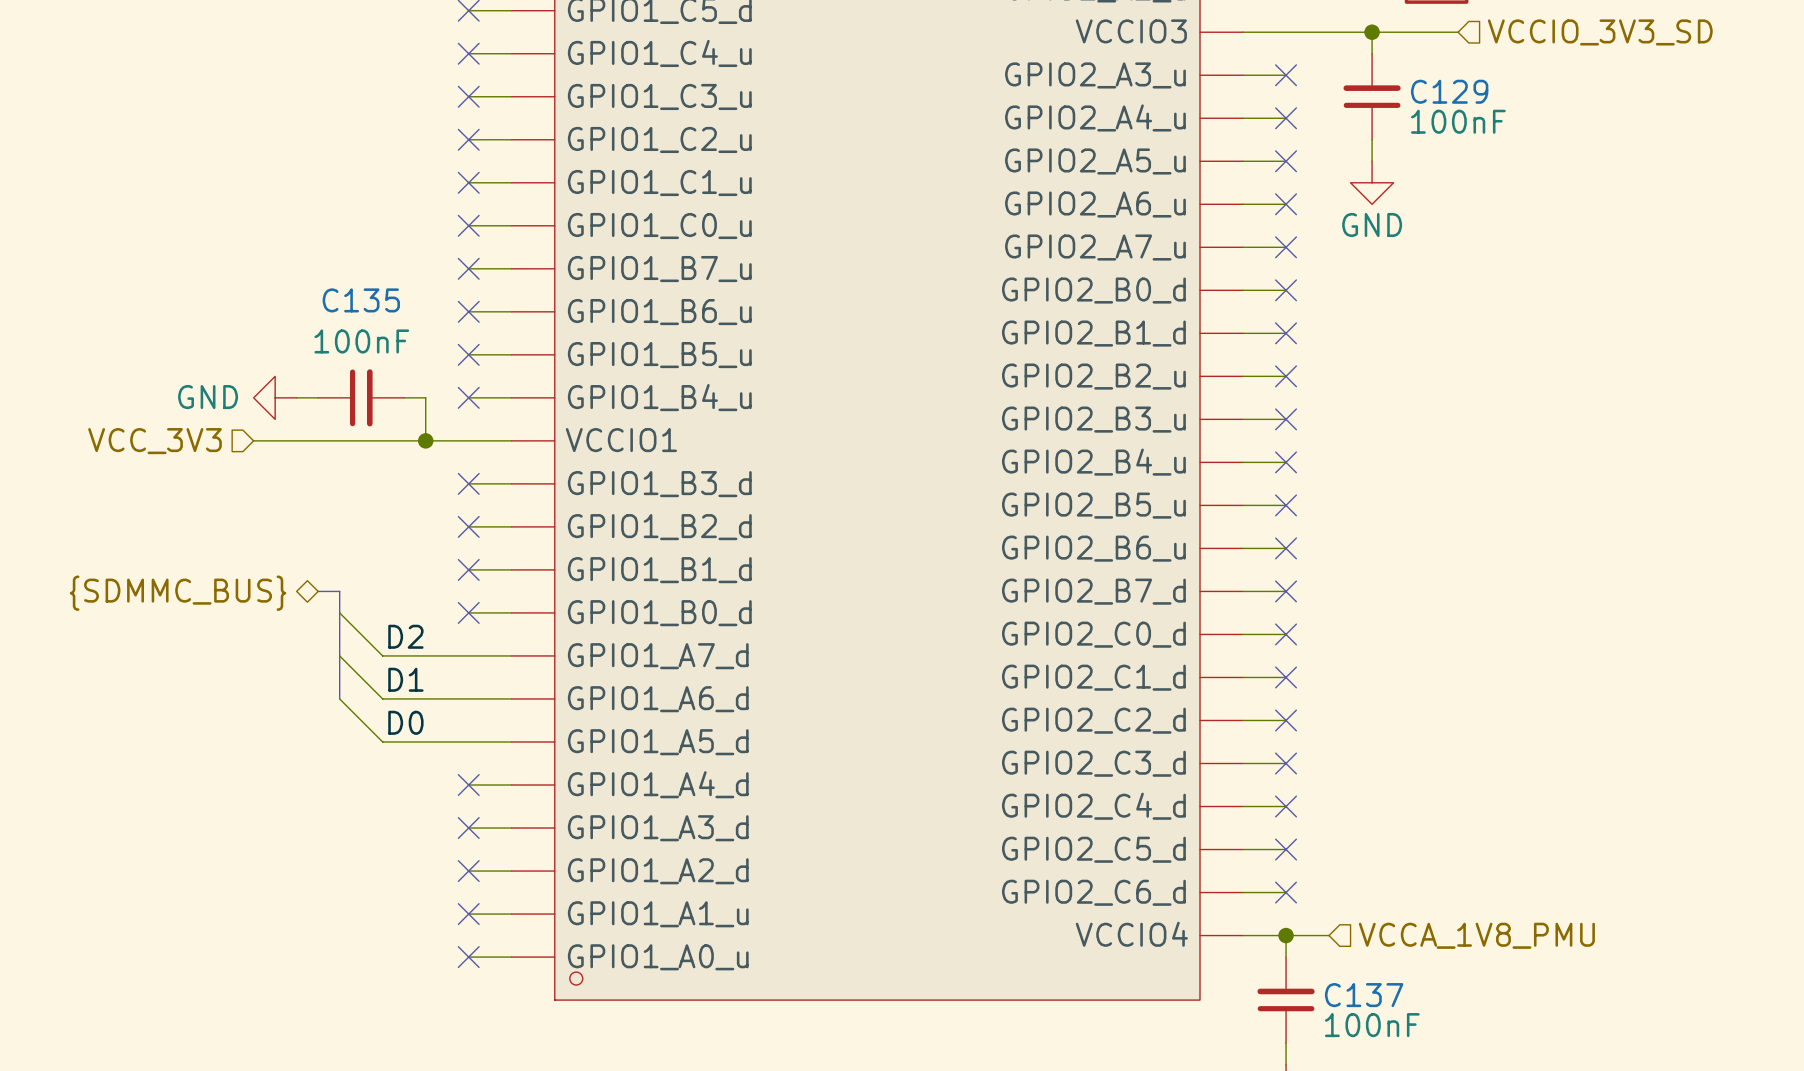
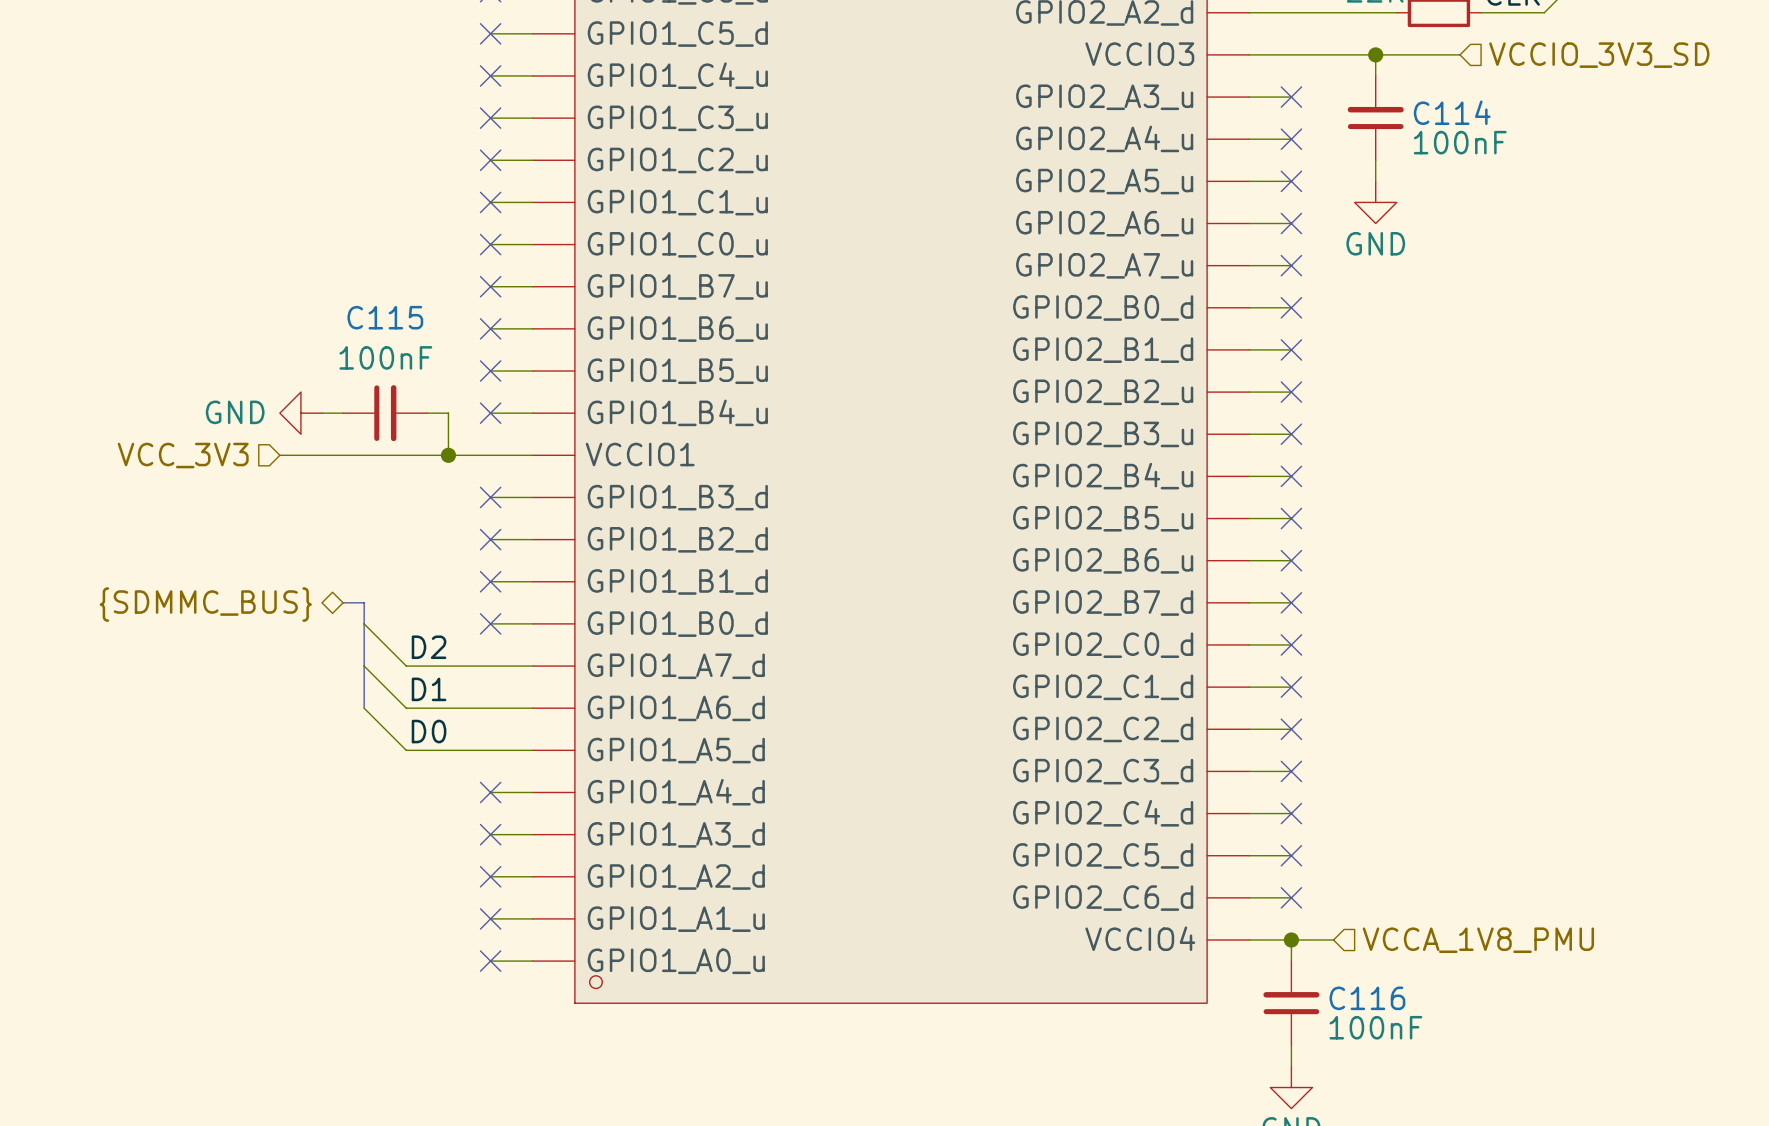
C129 name: C129 (1449, 91) -> C114 (1452, 112)
C135 name: C135 (361, 300) -> C115 (385, 317)
C137 name: C137 (1364, 995) -> C116 (1367, 998)

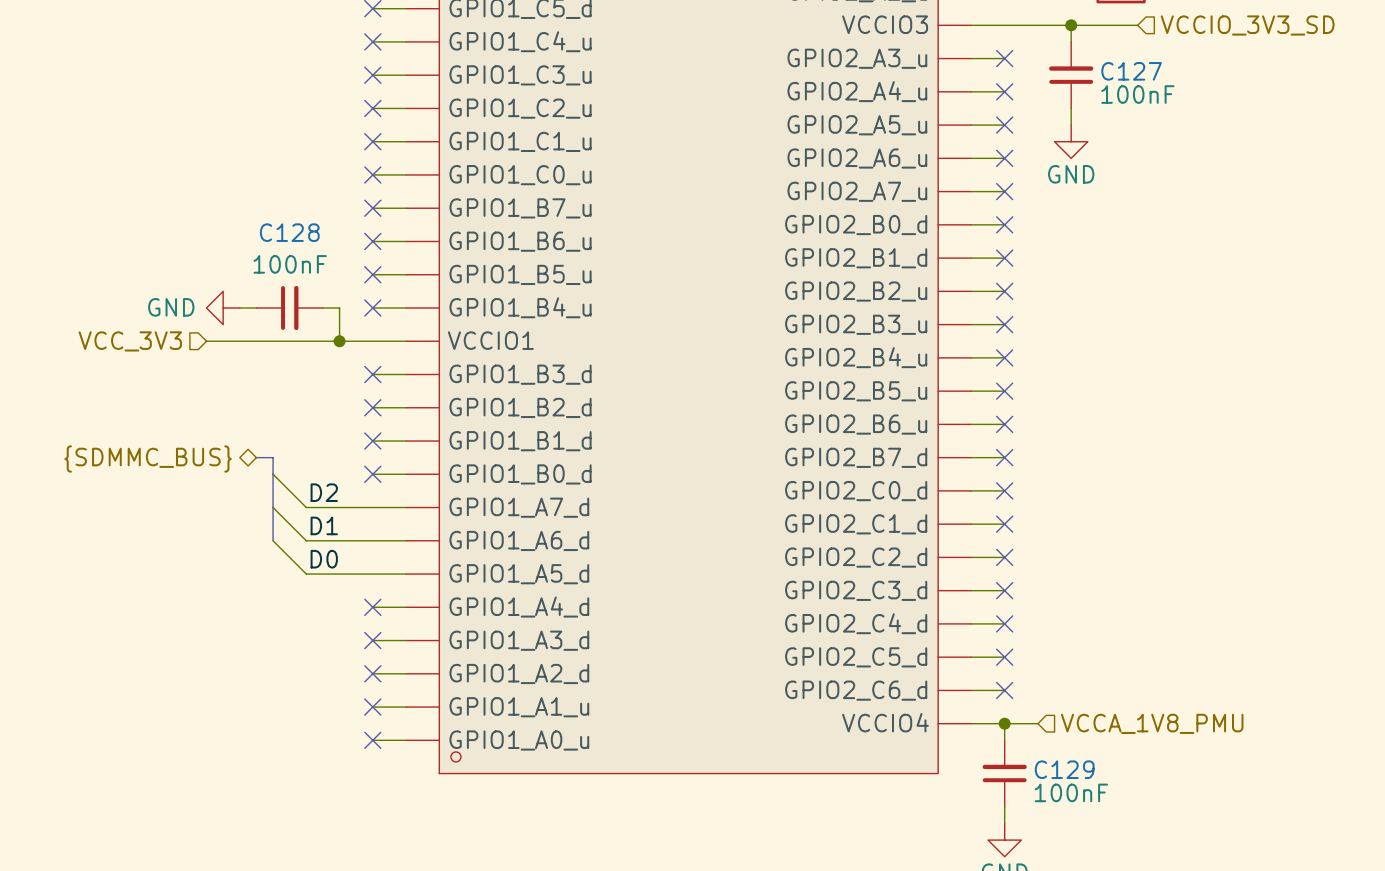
C114 name: C114 (1452, 112) -> C127 (1131, 71)
C115 name: C115 (385, 317) -> C128 (289, 232)
C116 name: C116 (1367, 998) -> C129 (1064, 769)

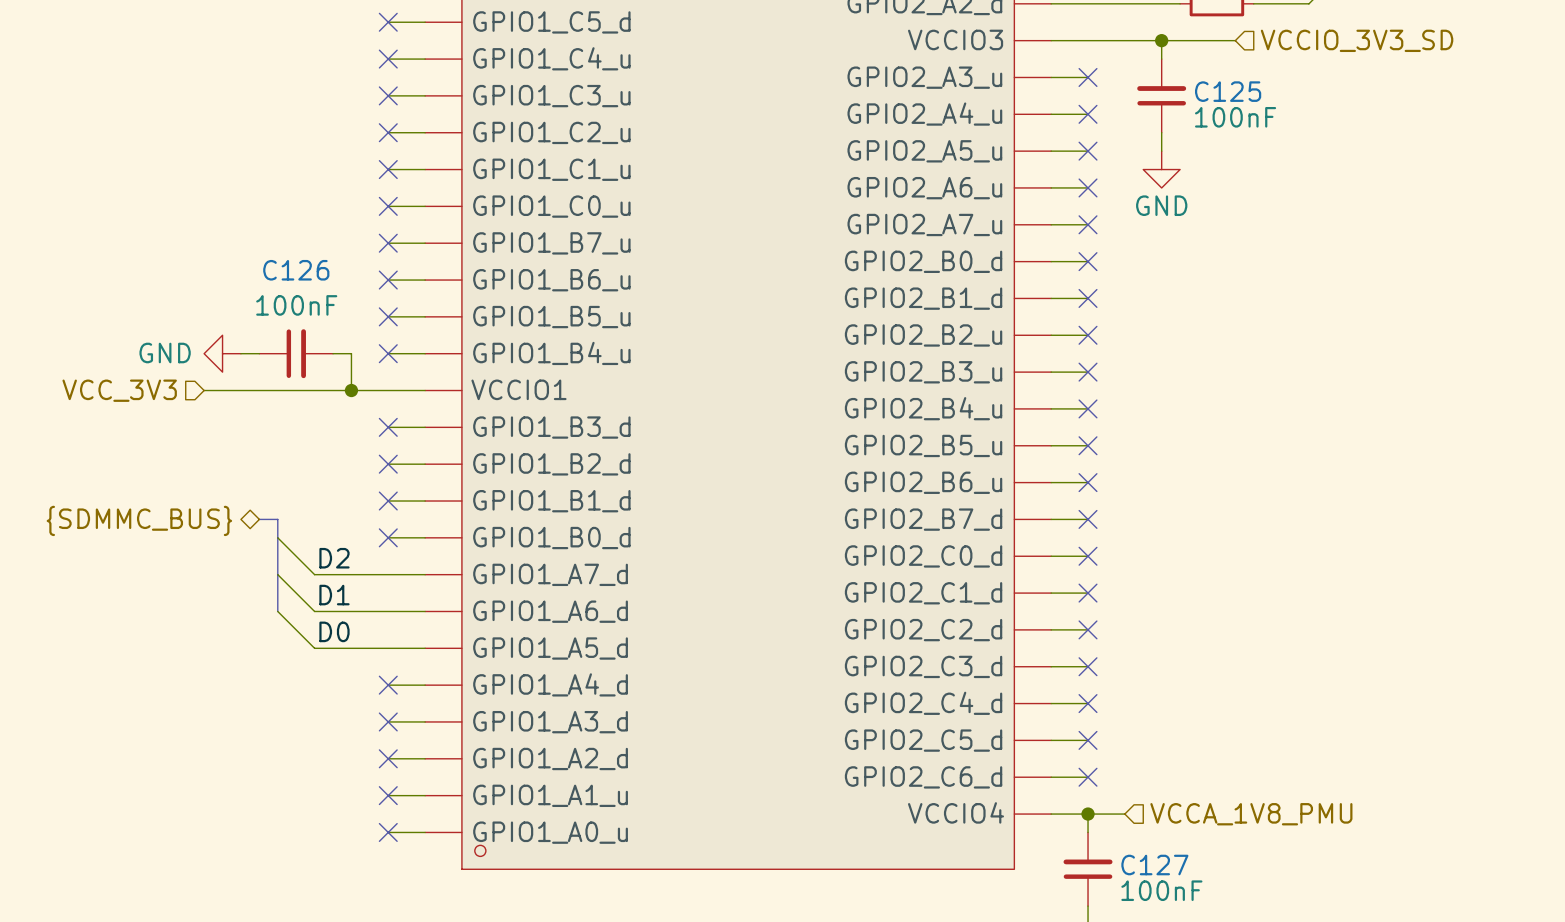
C127 name: C127 (1131, 71) -> C125 (1228, 91)
C128 name: C128 (289, 232) -> C126 (296, 270)
C129 name: C129 (1064, 769) -> C127 (1154, 865)

